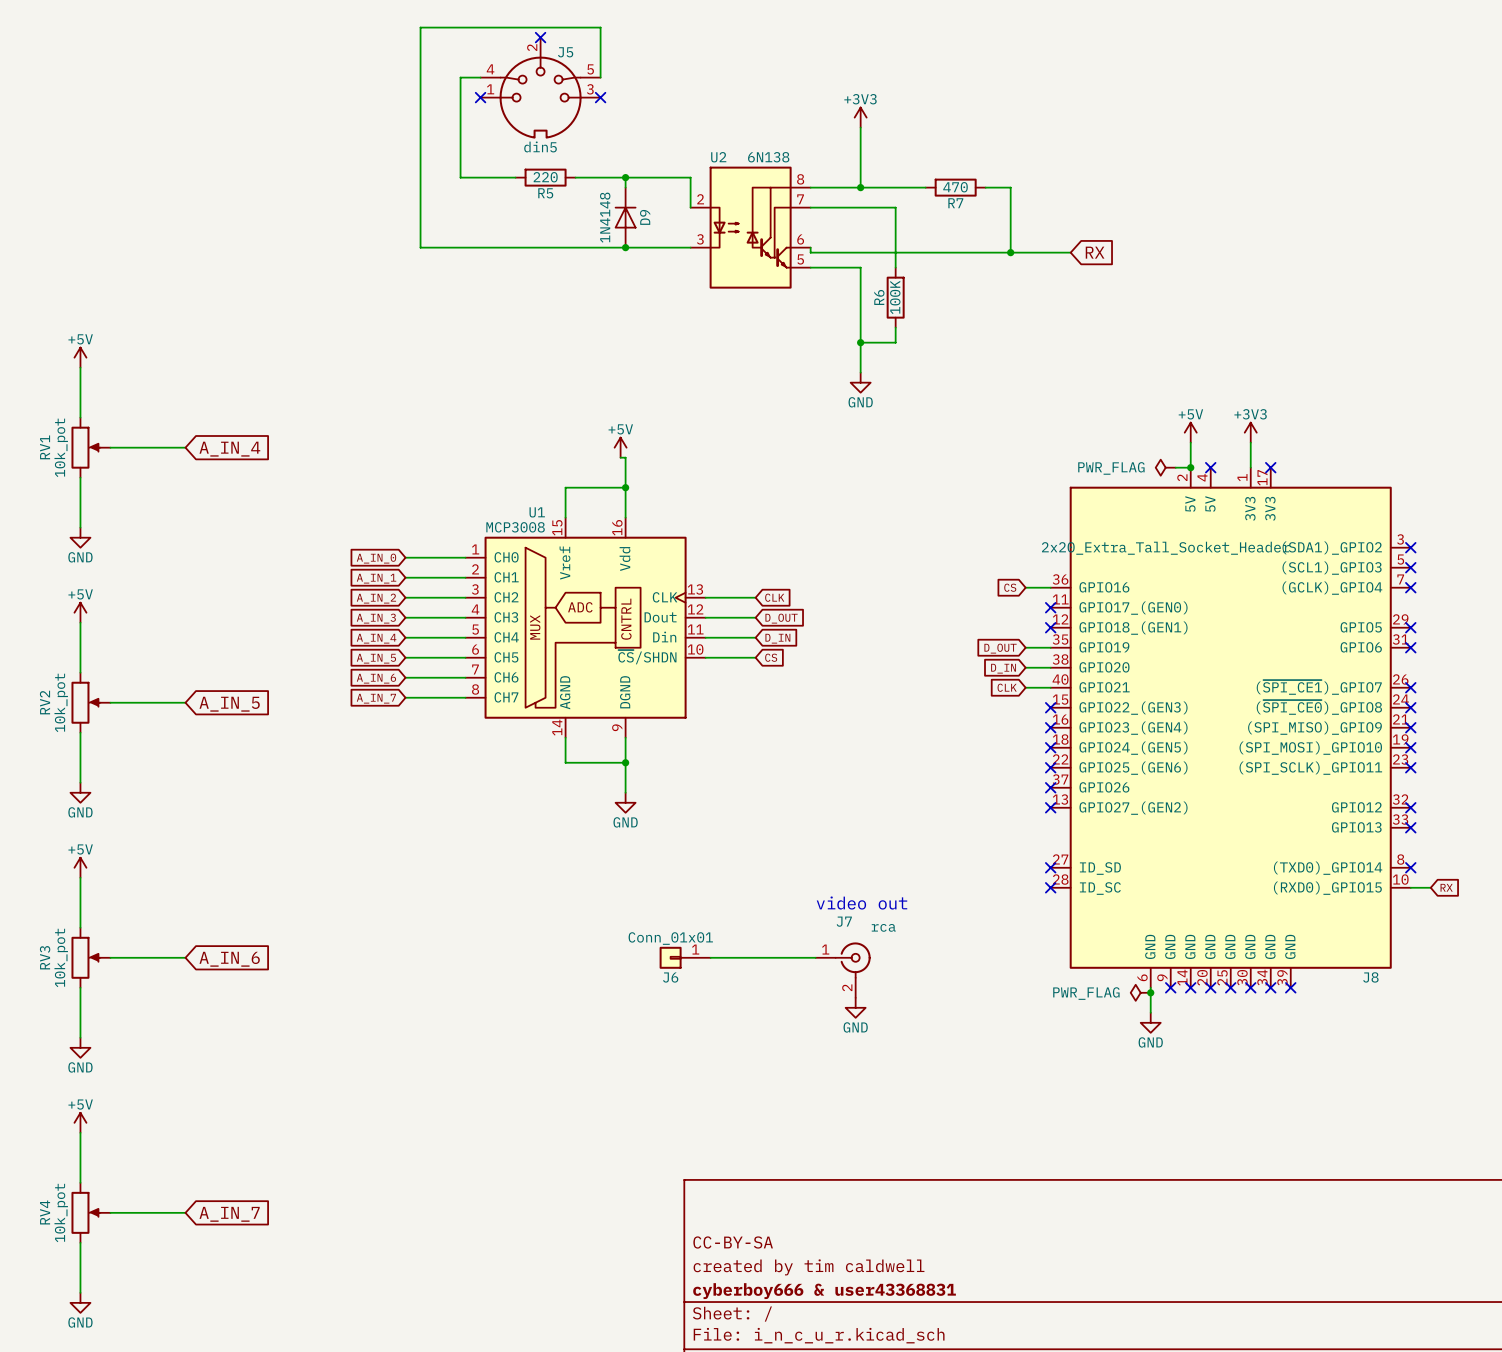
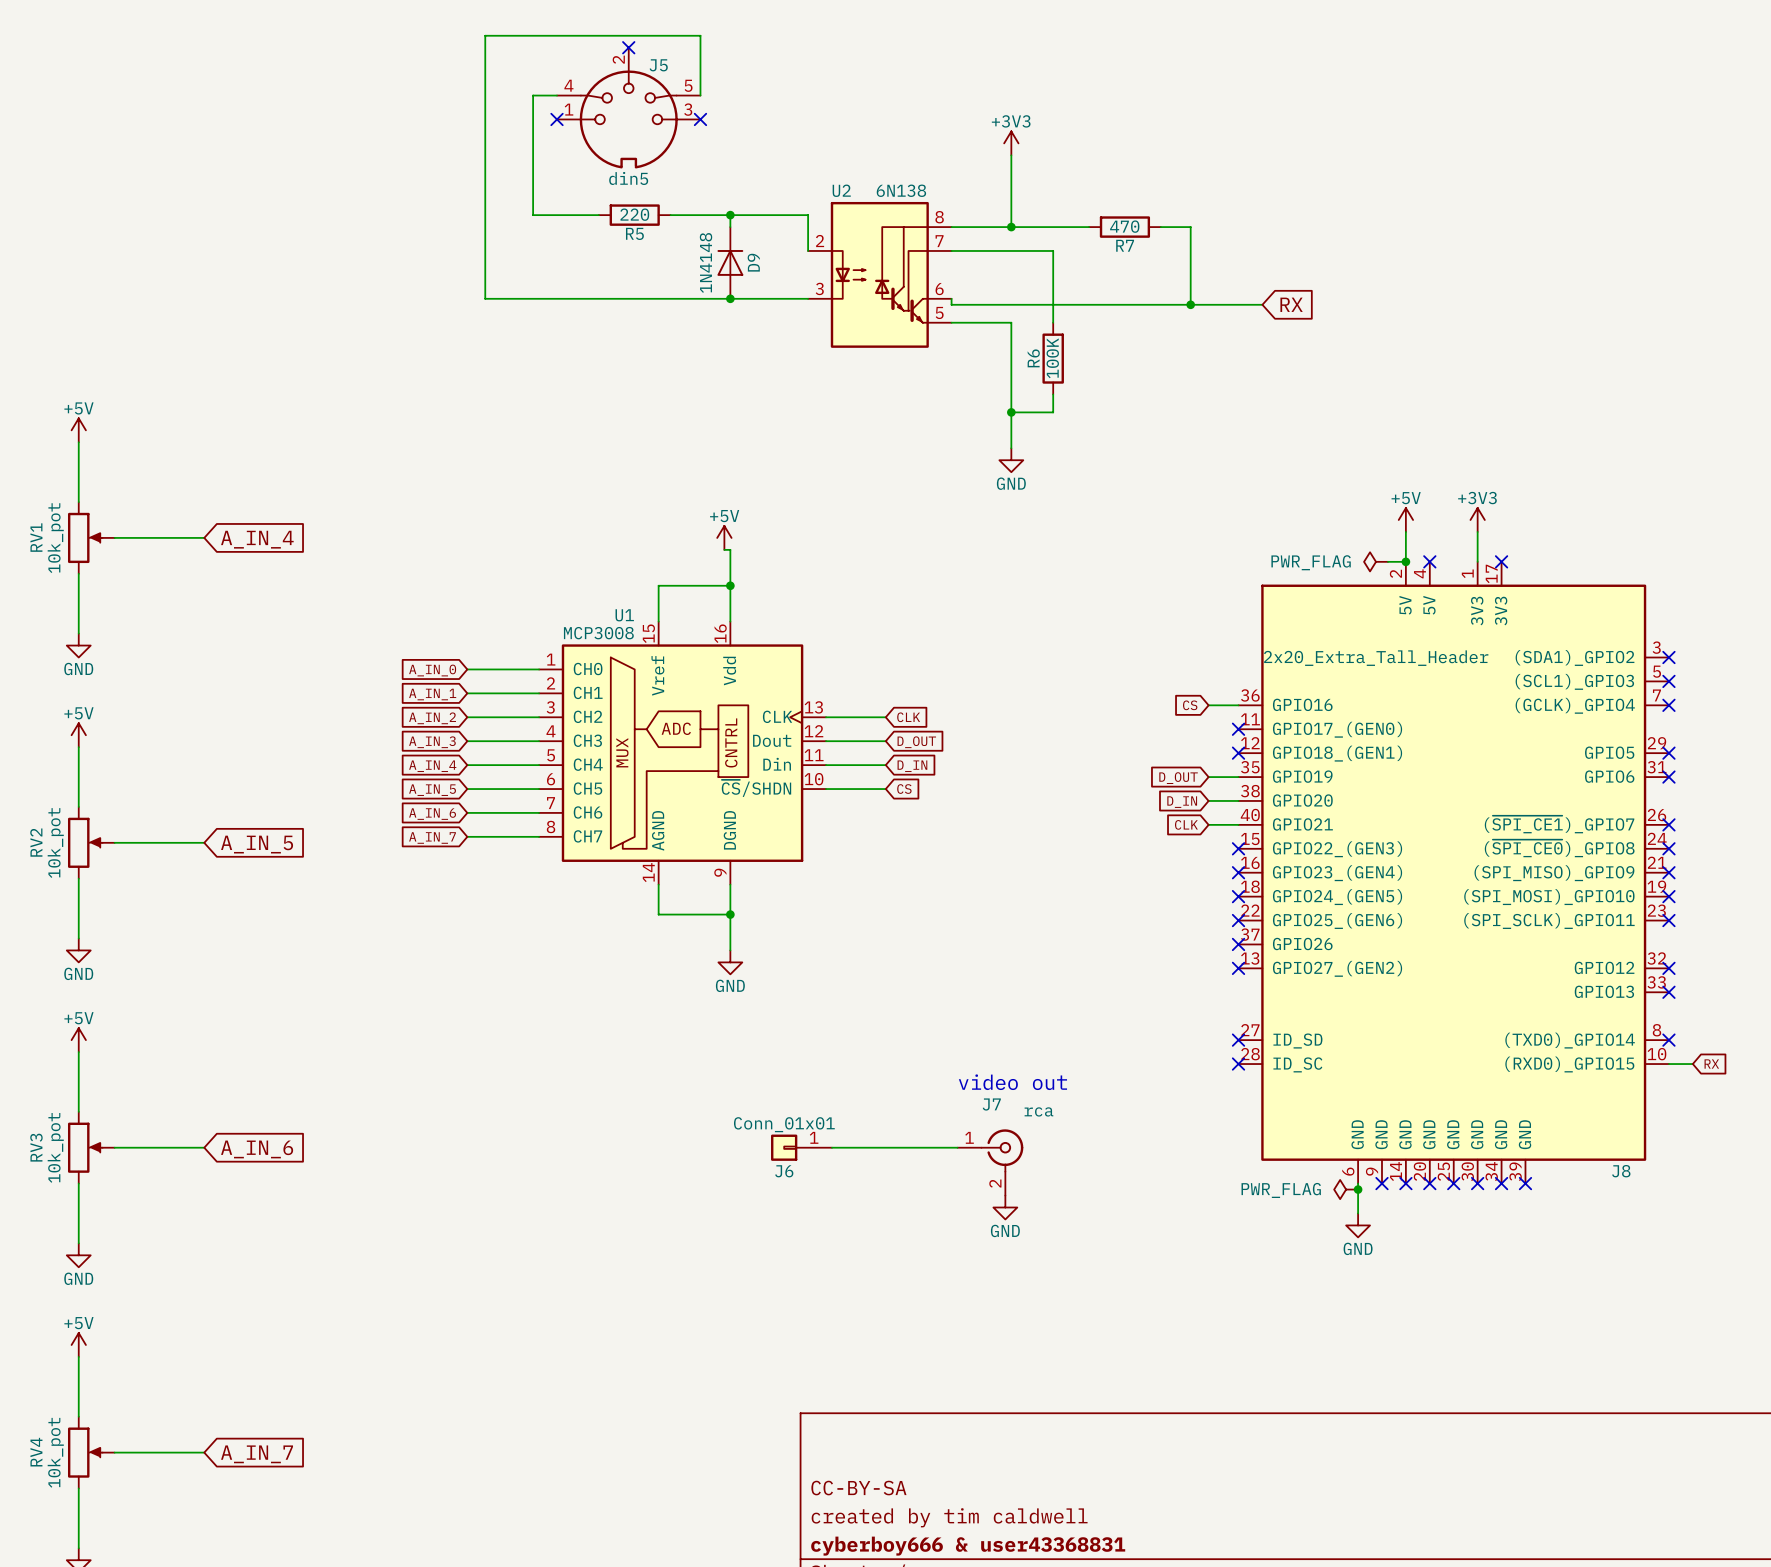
J8 value: 2x20_Extra_Tall_Socket_Header (1165, 548) -> 2x20_Extra_Tall_Header (1376, 658)

